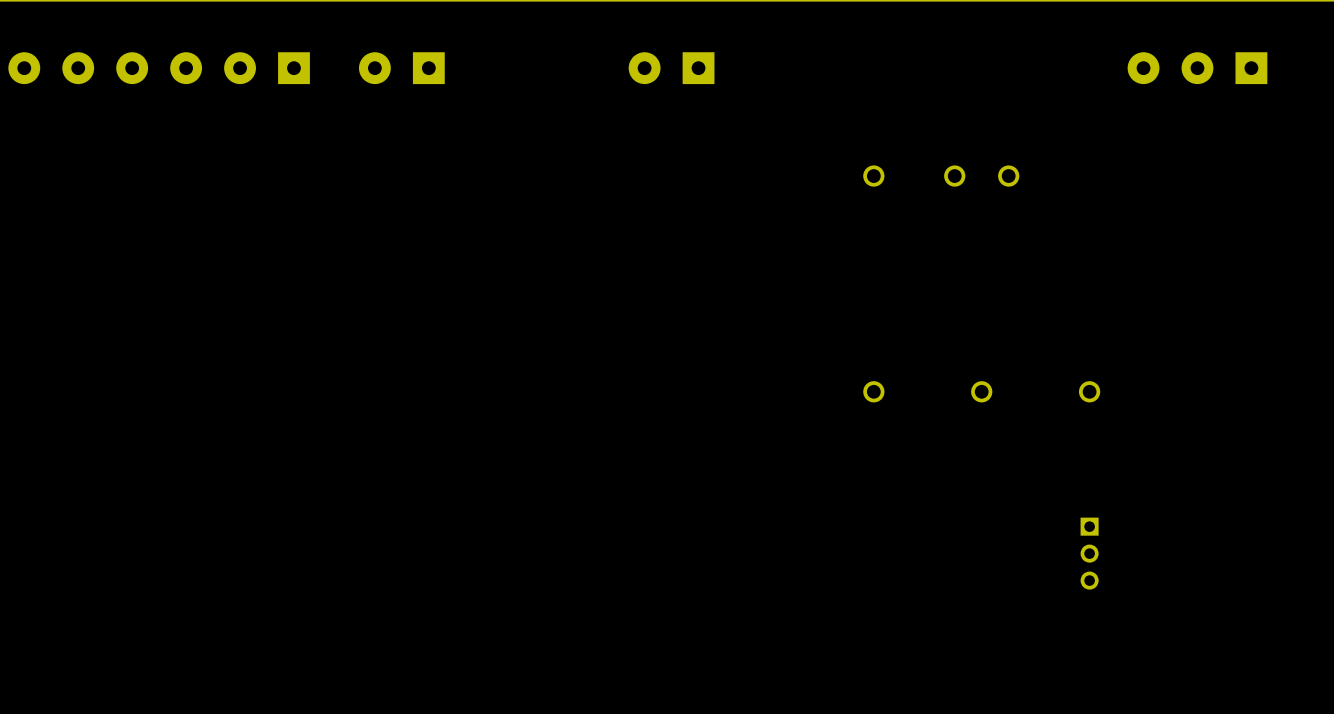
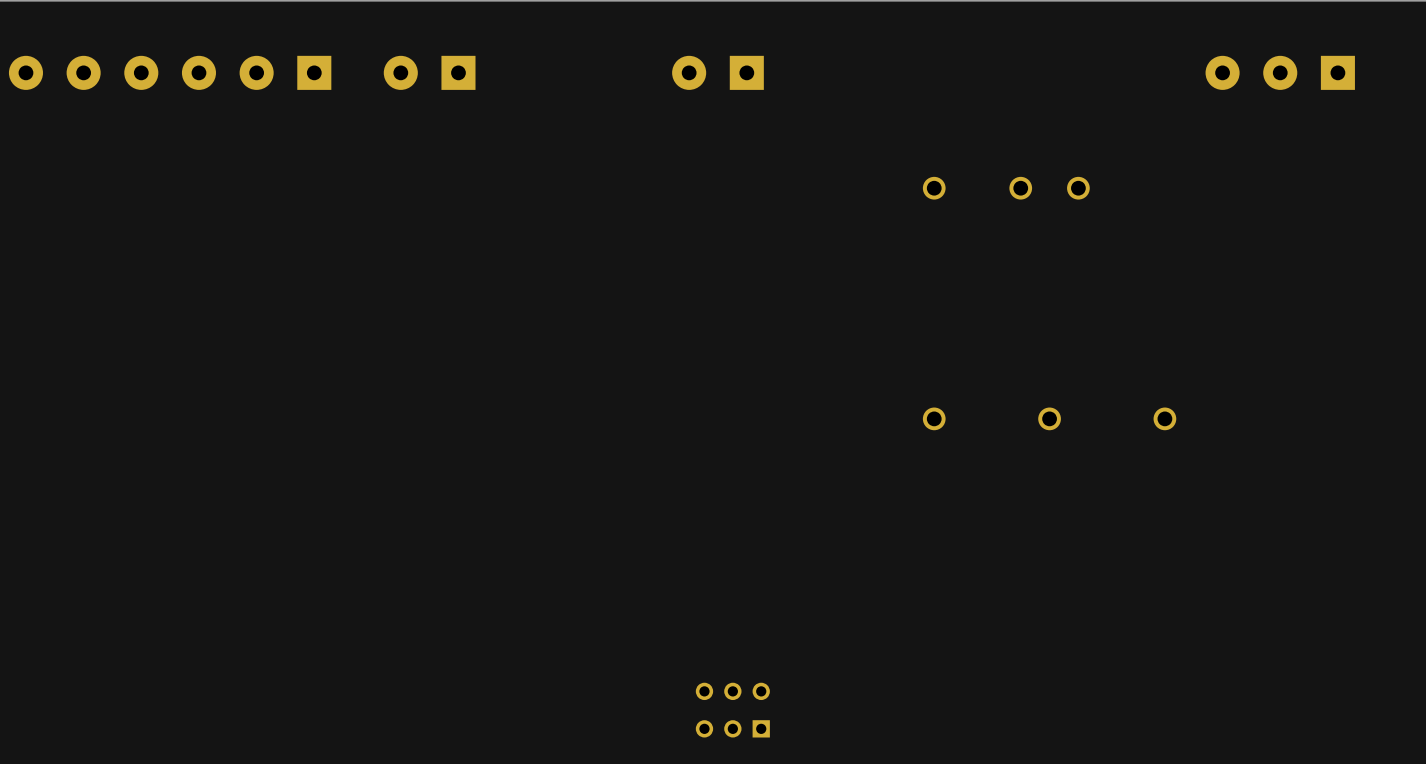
part: (1089, 553) -> none
part: none -> (732, 710)

